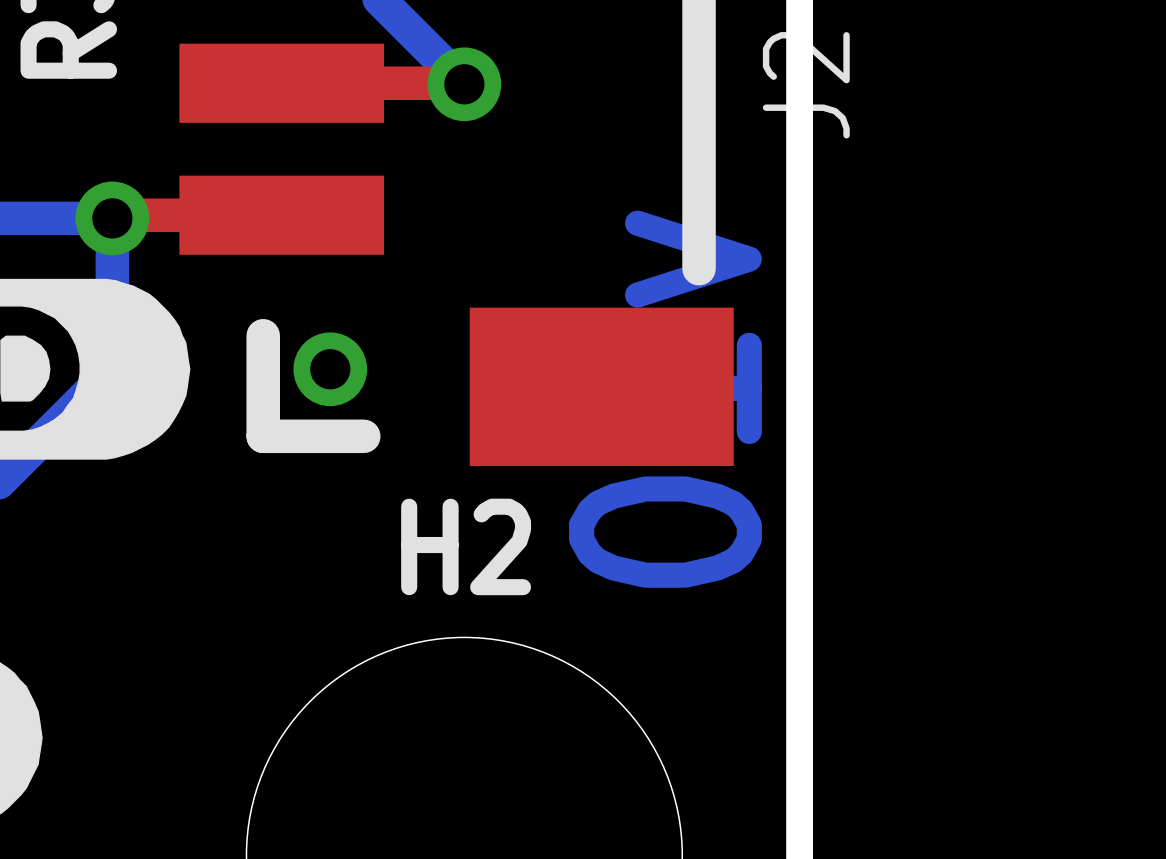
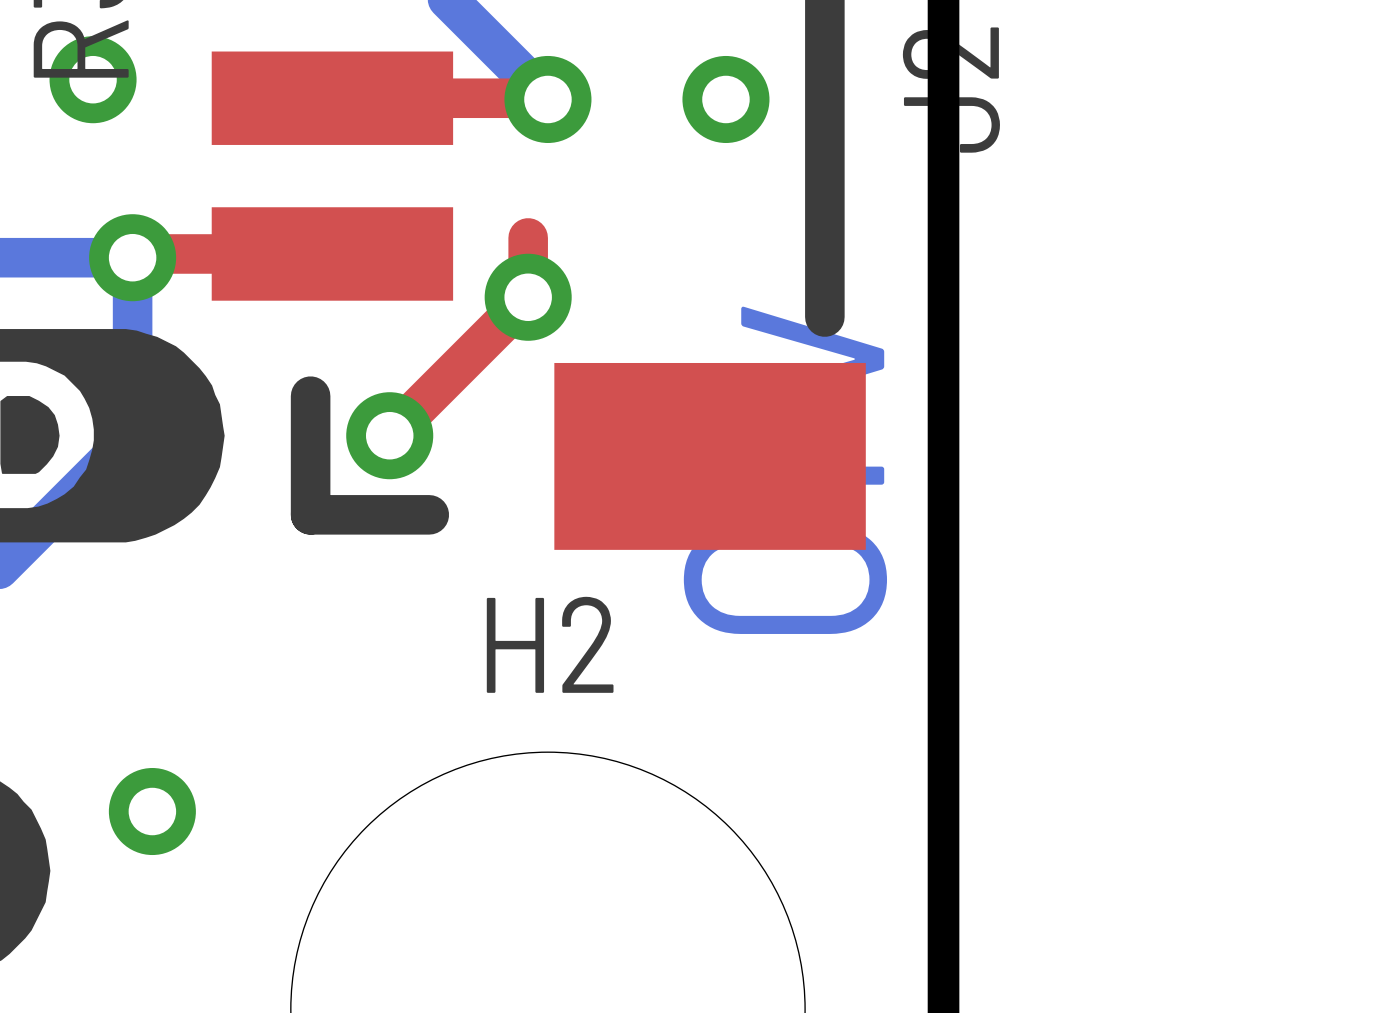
via: none -> (93, 79)
via: none -> (725, 99)
top track: none -> (528, 237) (528, 297) (389, 435)
via: none -> (528, 297)
via: none -> (152, 811)

